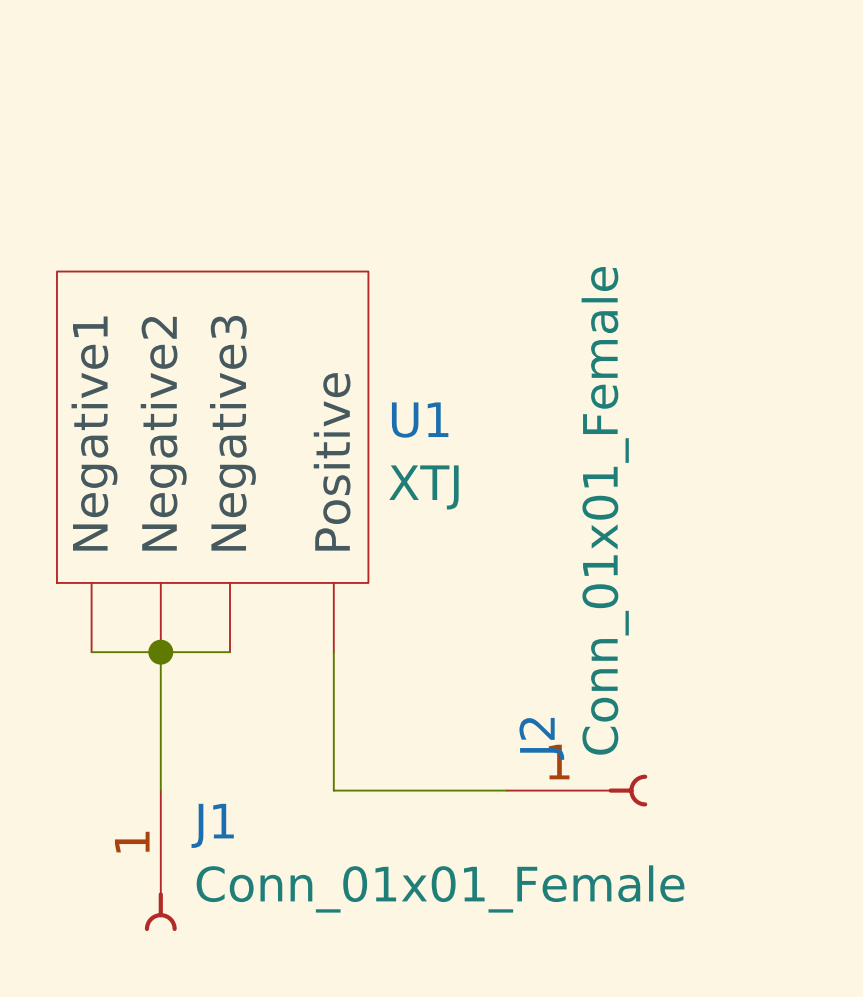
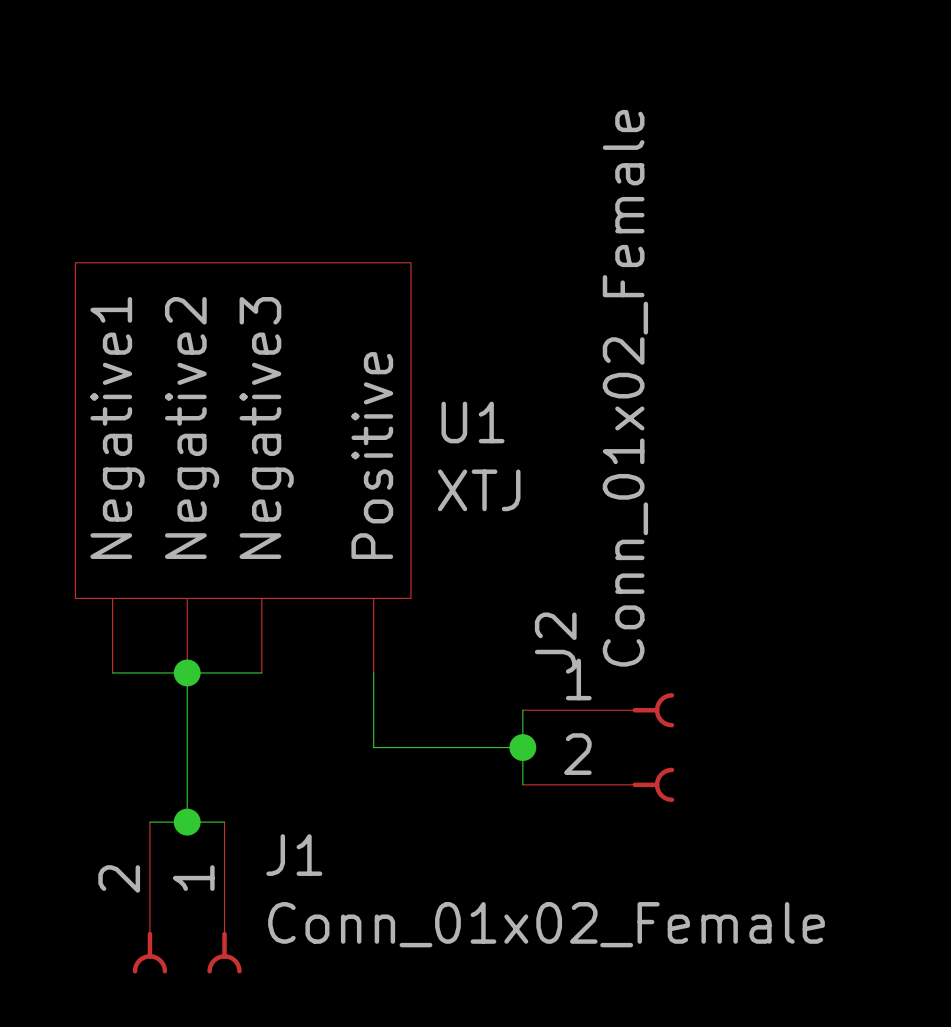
J2 value: Conn_01x01_Female (605, 510) -> Conn_01x02_Female (625, 388)
wire: none -> (522, 710) (522, 784)
wire: (333, 721) (333, 790) (506, 790) -> (373, 747) (522, 747)
junction: none -> (522, 747)
J2 symbol: [506, 774, 648, 807] -> [522, 693, 675, 802]
wire: none -> (149, 822) (224, 822)
J1 symbol: [144, 790, 177, 932] -> [132, 822, 242, 974]
junction: none -> (187, 822)
J1 value: Conn_01x01_Female (440, 888) -> Conn_01x02_Female (546, 924)

